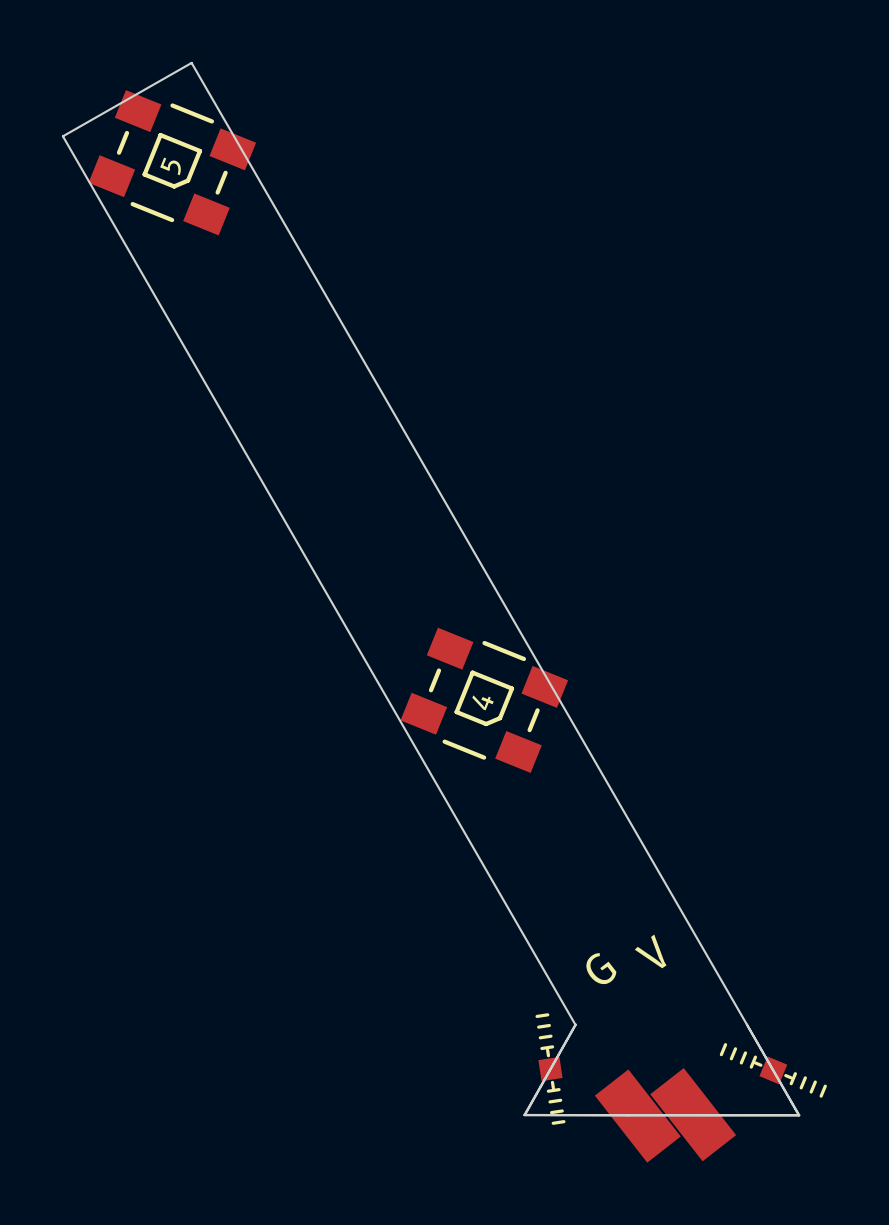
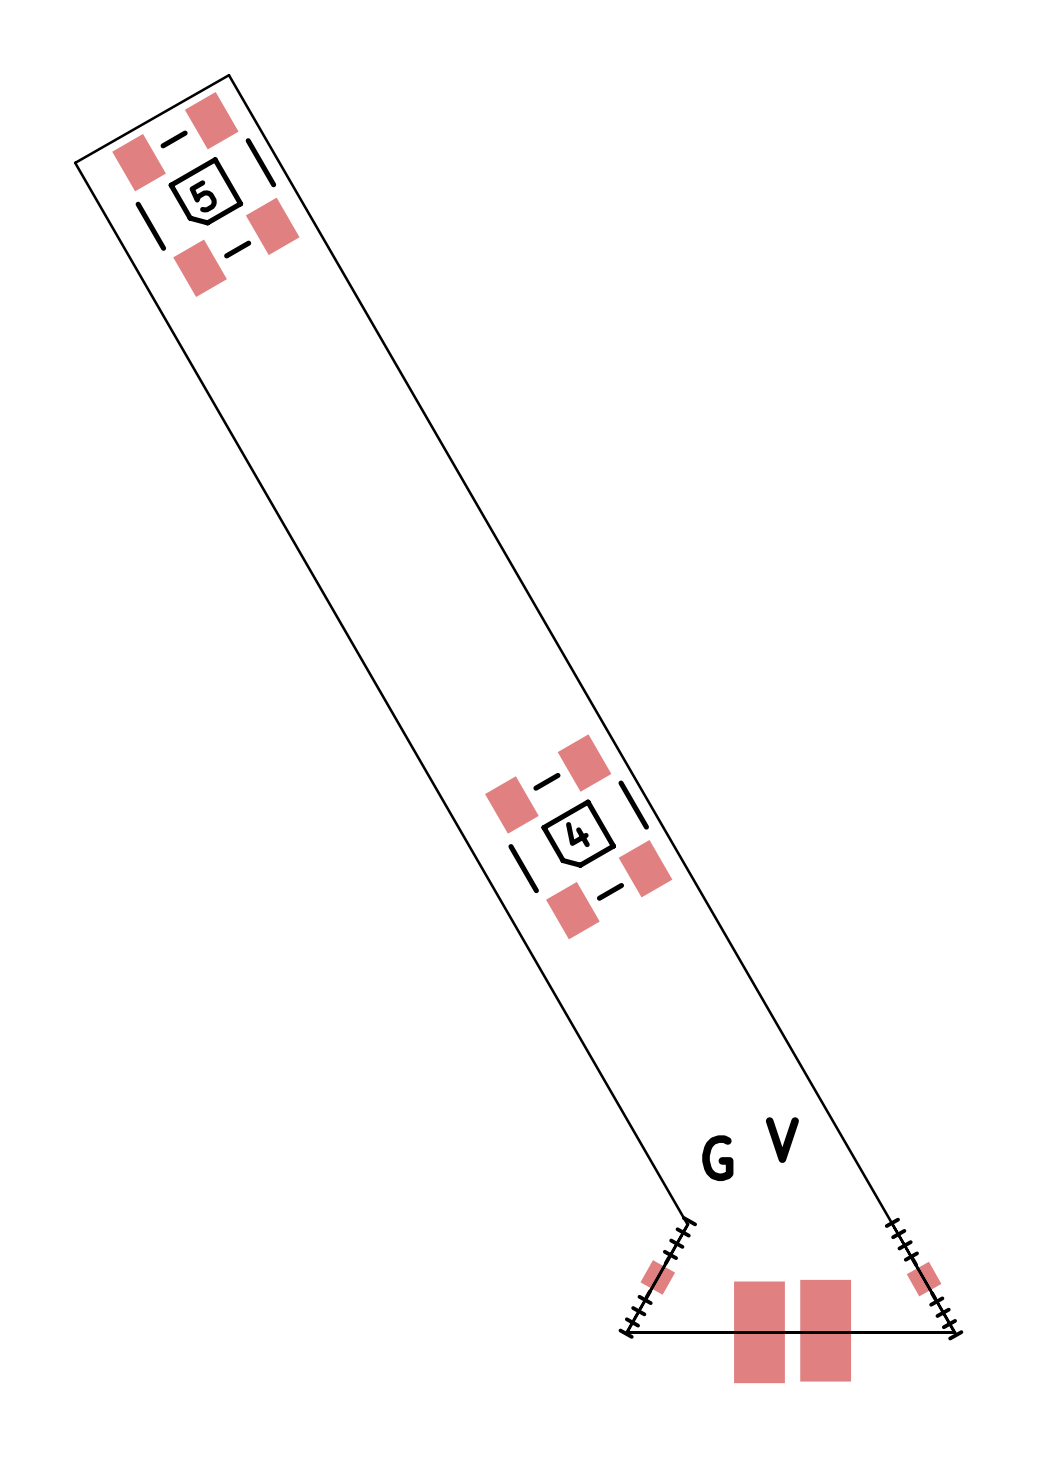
5 rotation: 0° (172, 162) -> 38° clockwise (205, 194)
4 rotation: 0° (484, 700) -> 38° clockwise (578, 836)
text rotation: 0° (650, 951) -> 38° clockwise (782, 1140)
text rotation: 0° (601, 968) -> 38° clockwise (717, 1158)
part rotation: 0° (550, 1069) -> 38° clockwise (657, 1277)
part rotation: 0° (773, 1070) -> 38° clockwise (924, 1279)
part rotation: 0° (693, 1114) -> 38° clockwise (825, 1330)
part rotation: 0° (637, 1116) -> 38° clockwise (759, 1332)

